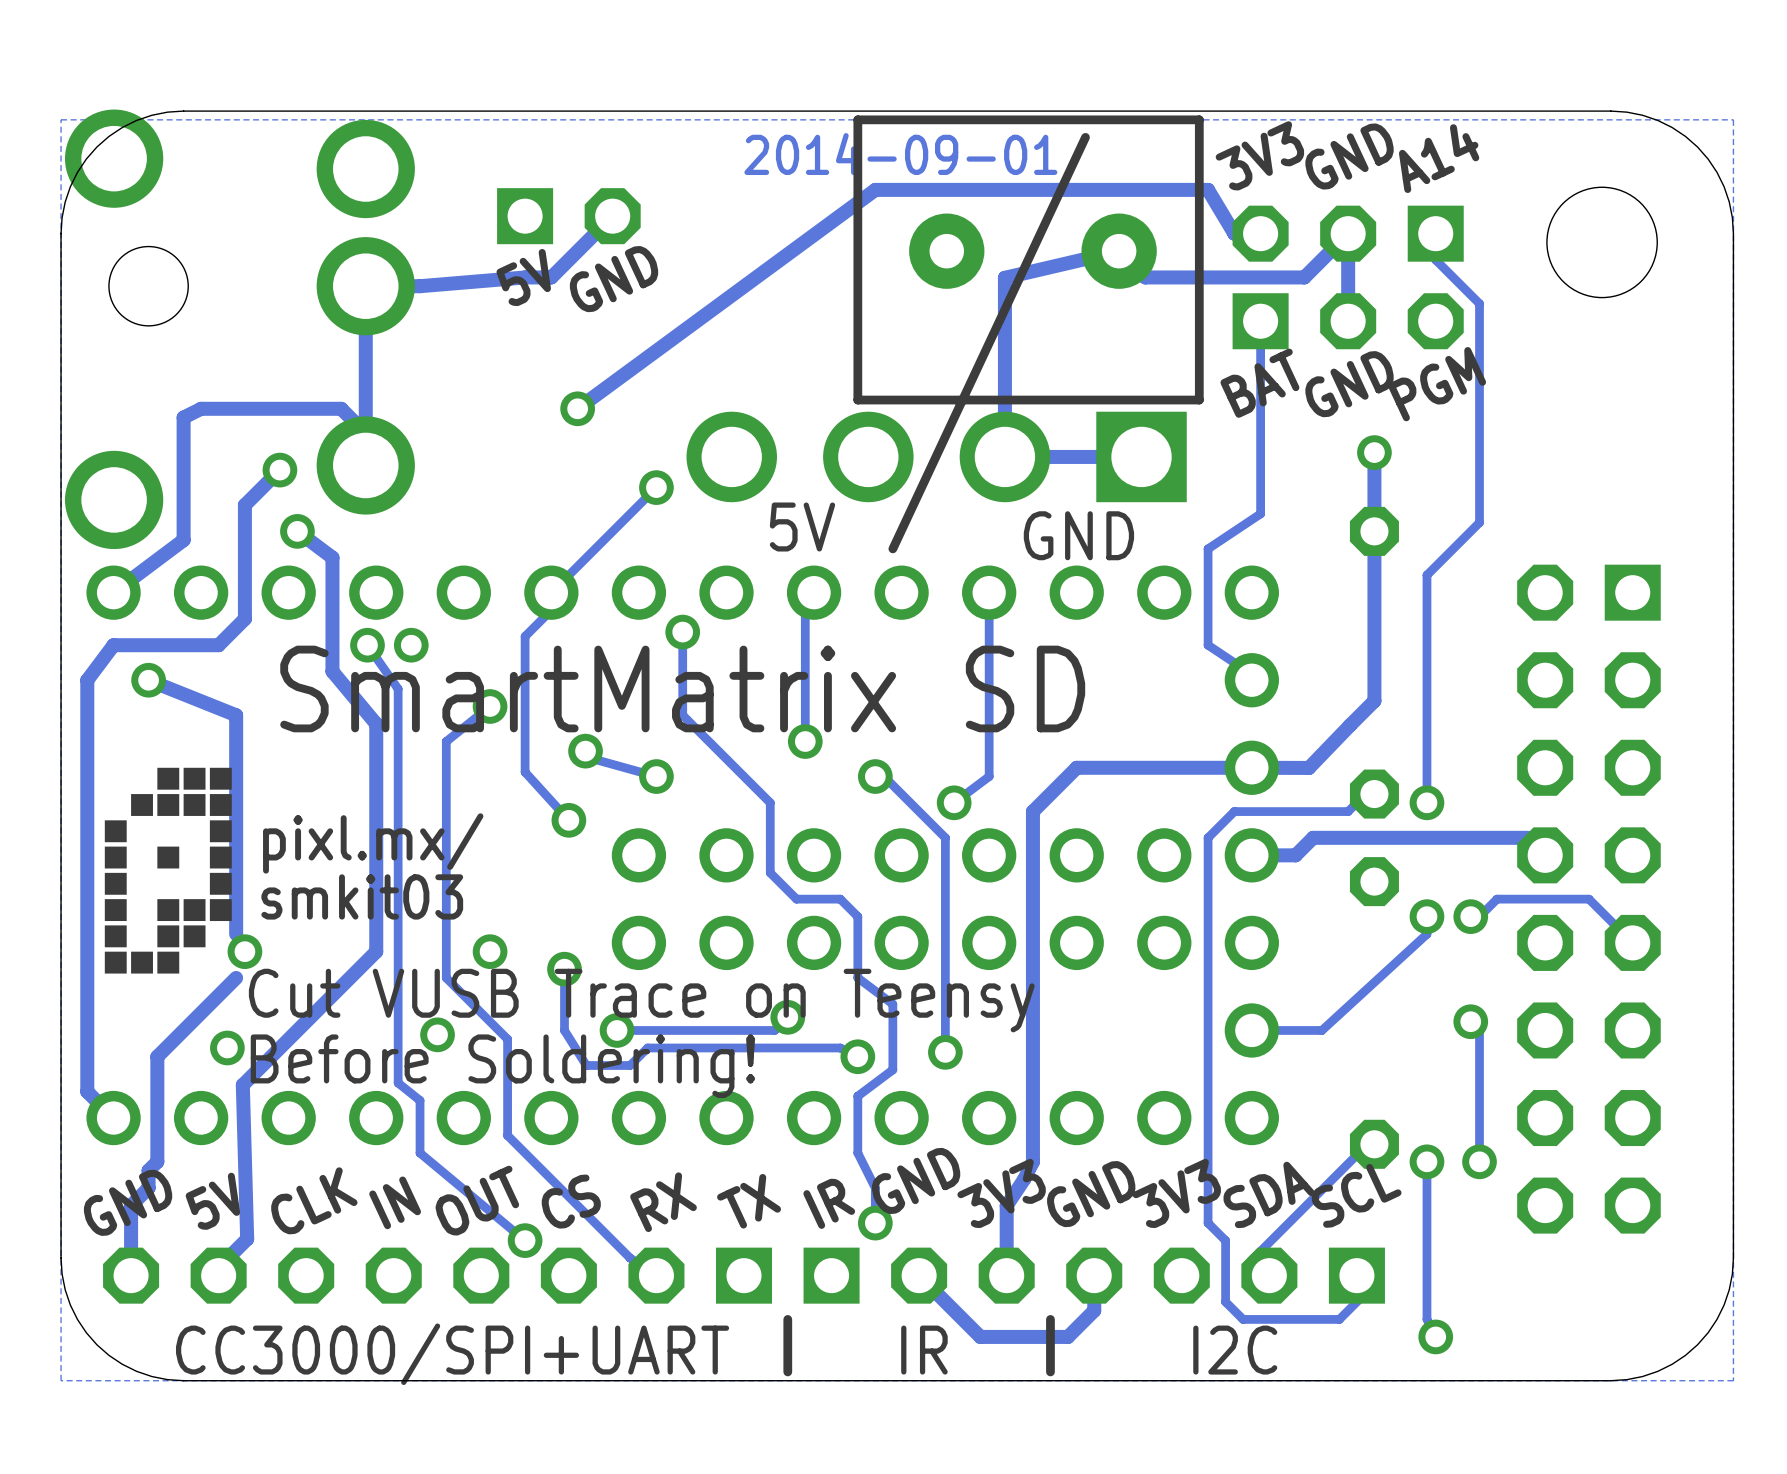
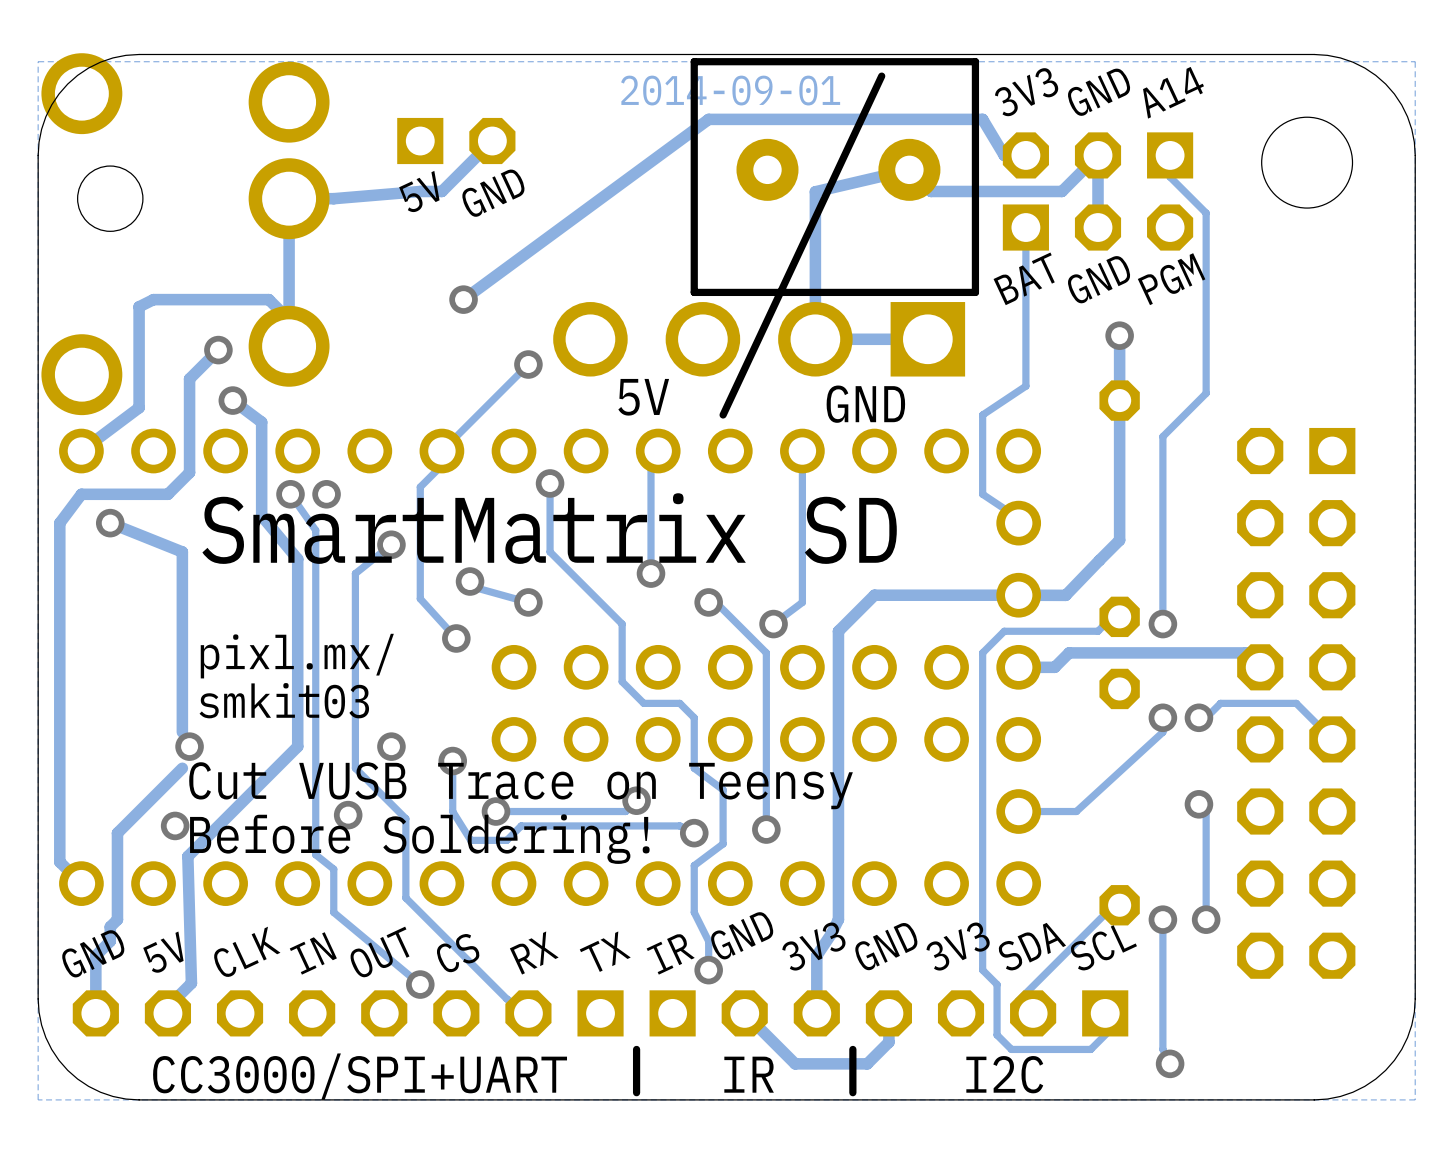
drawing: [104, 767, 232, 974] -> none

